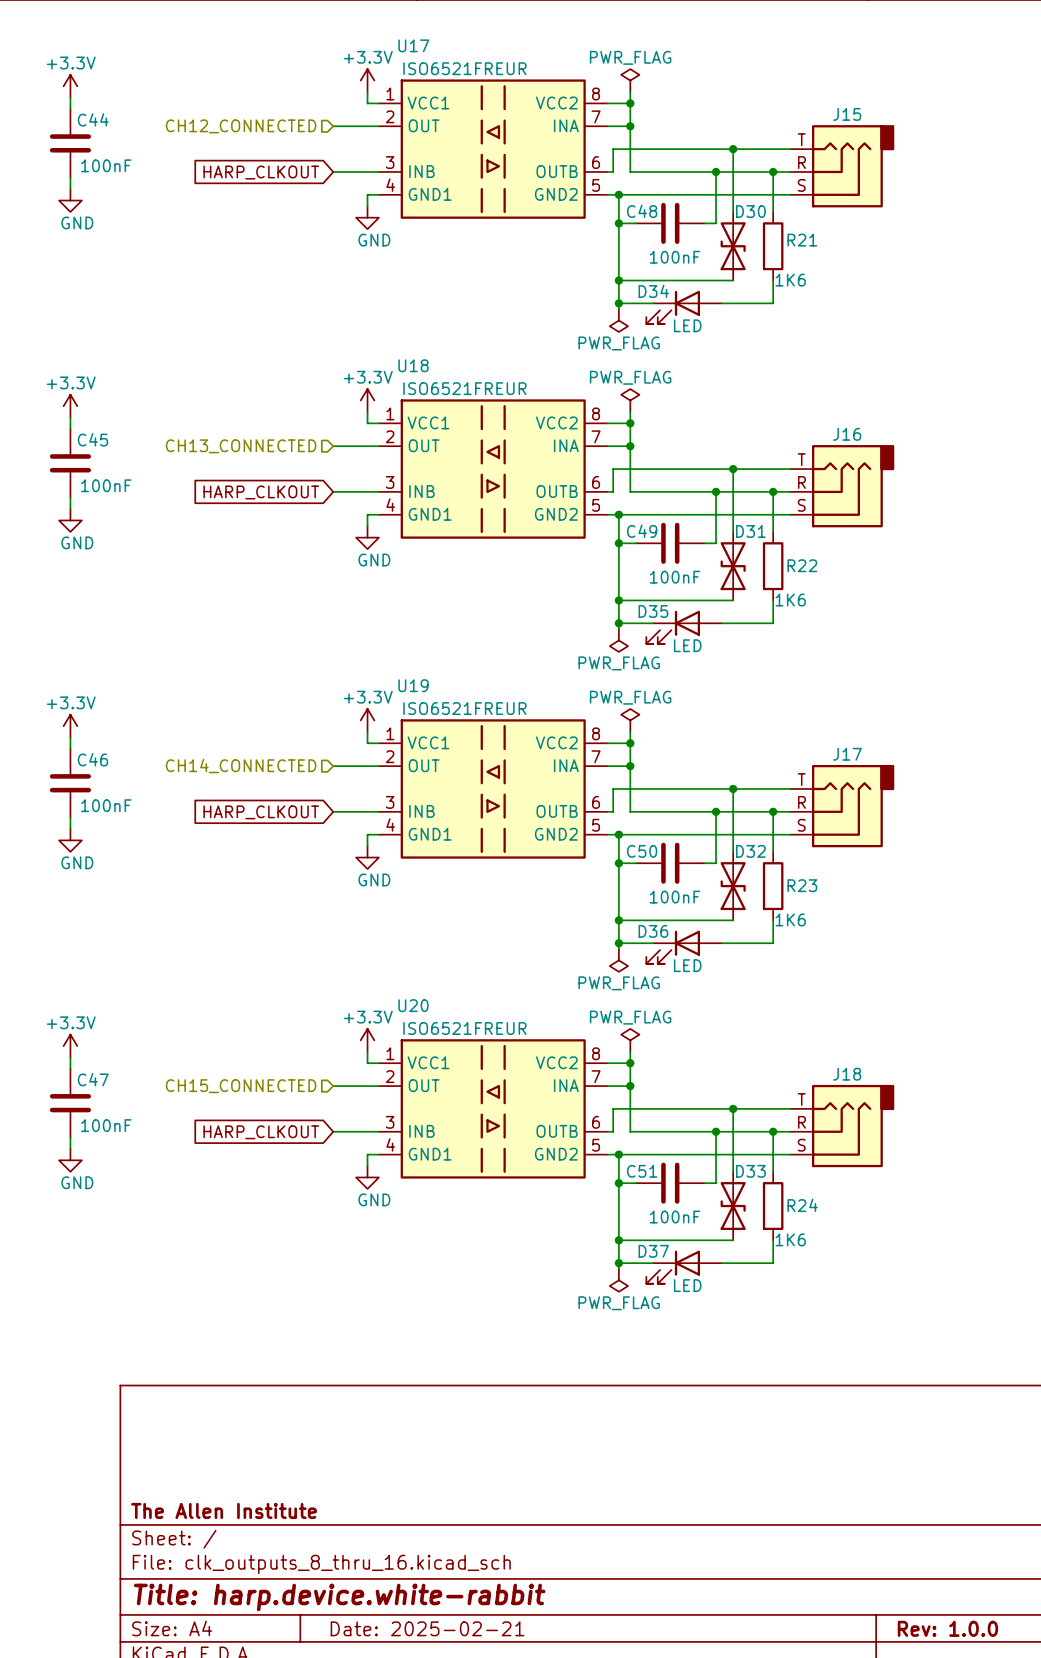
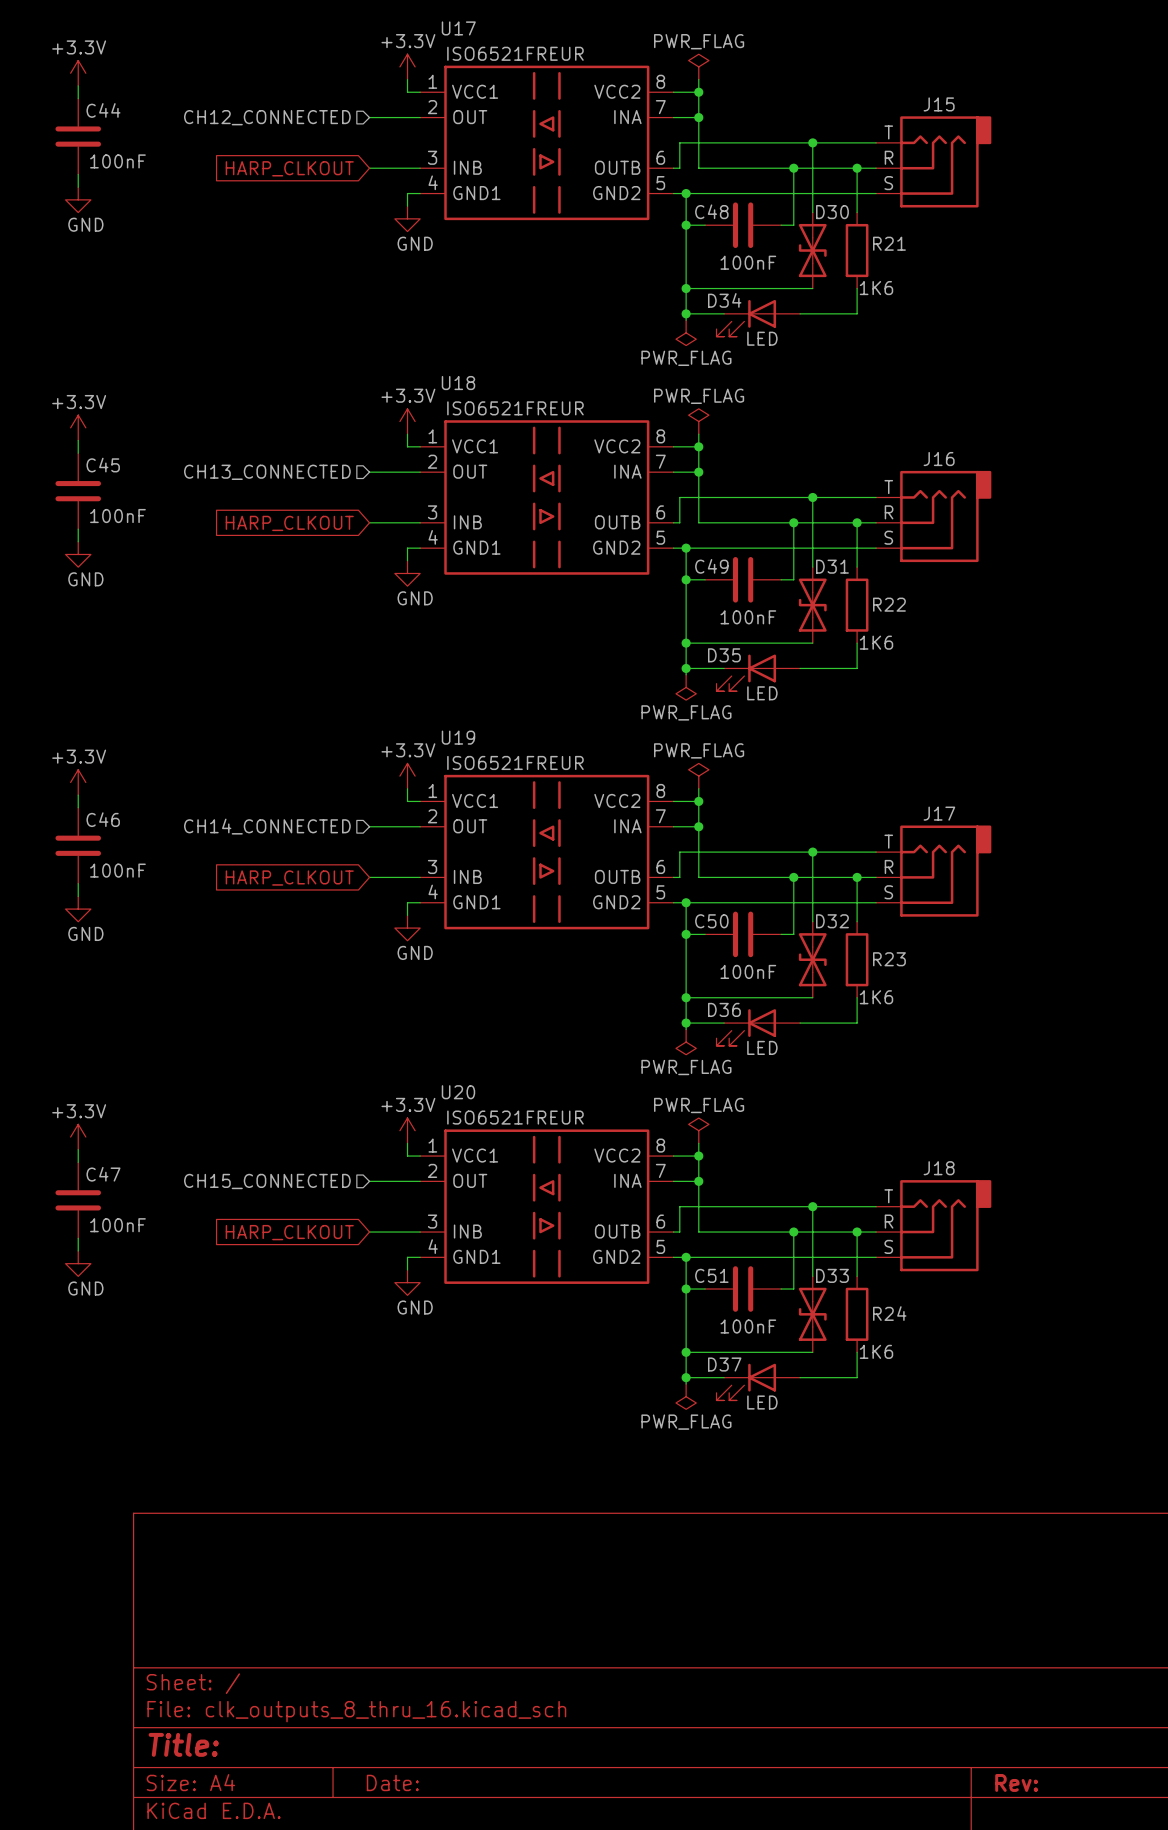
title block: The Allen Institute (224, 1510) -> none
title block: Title: harp.device.white-rabbit (339, 1597) -> Title: (183, 1744)
title block: Date: 2025-02-21 (427, 1628) -> Date: (392, 1782)
title block: Rev: 1.0.0 (947, 1628) -> Rev: (1016, 1782)

